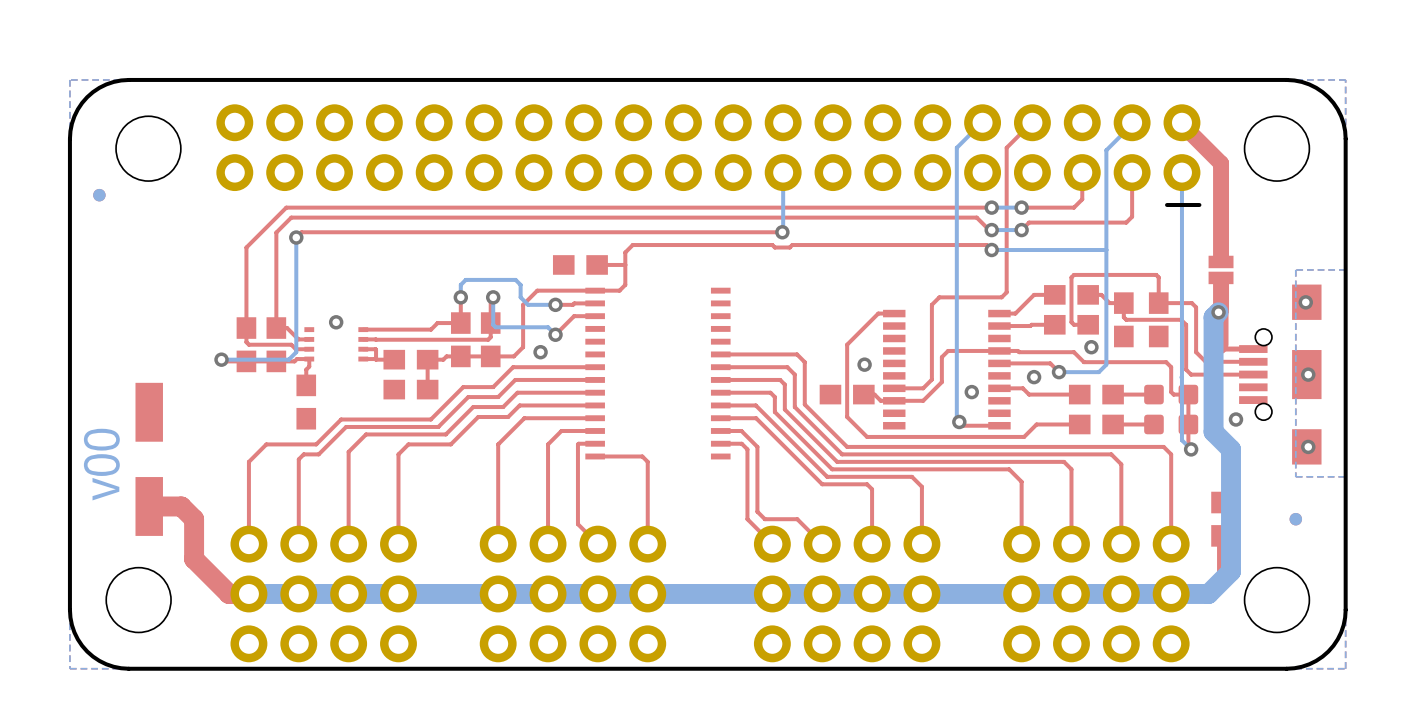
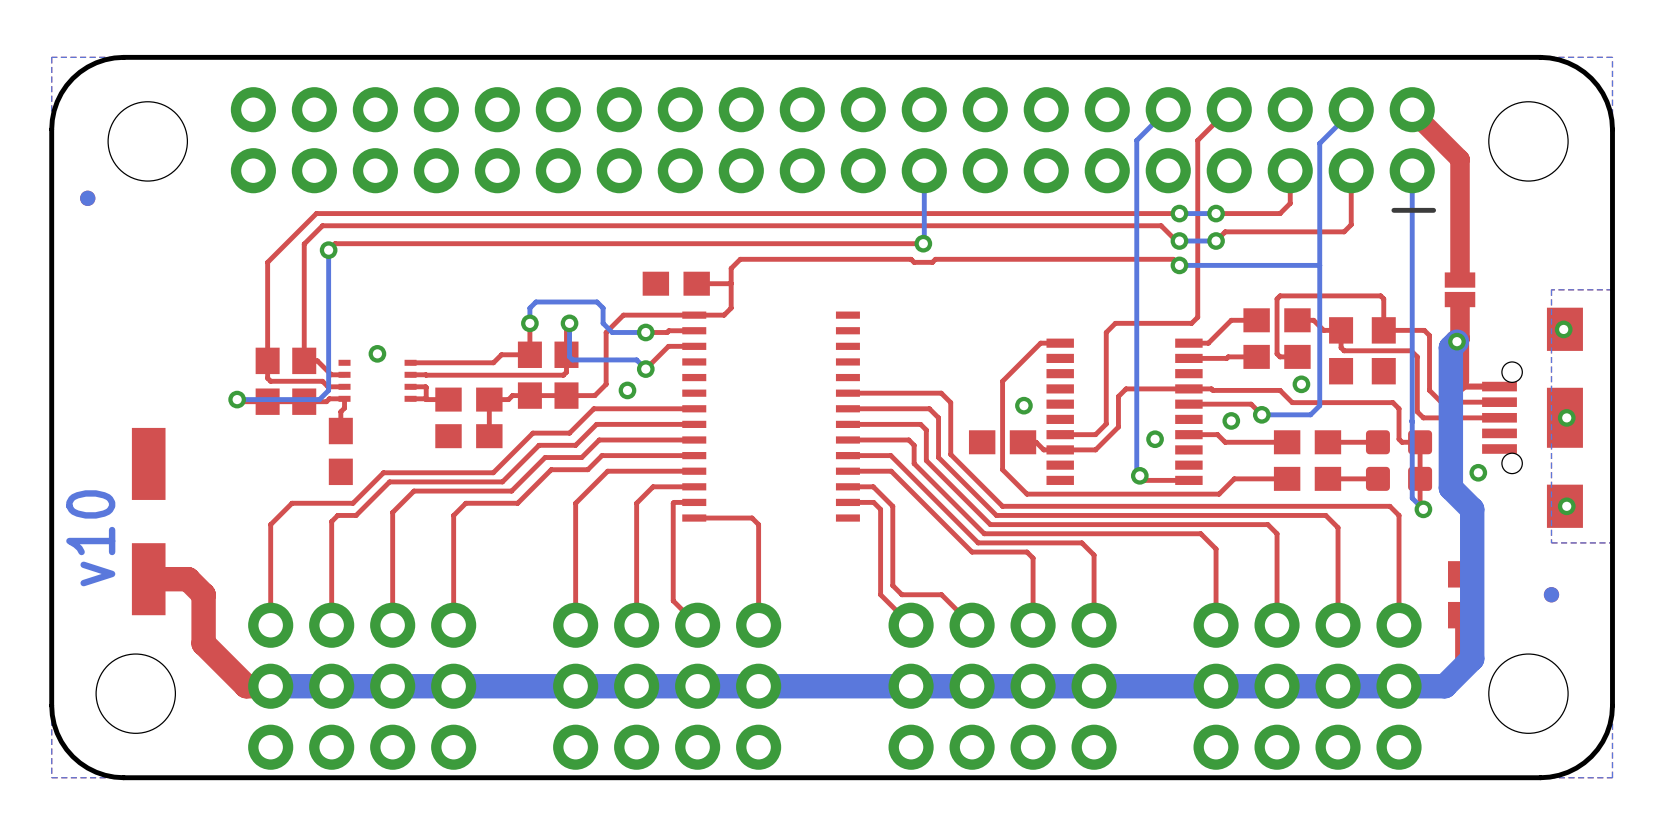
text: v00 (101, 464) -> v10 (90, 538)

